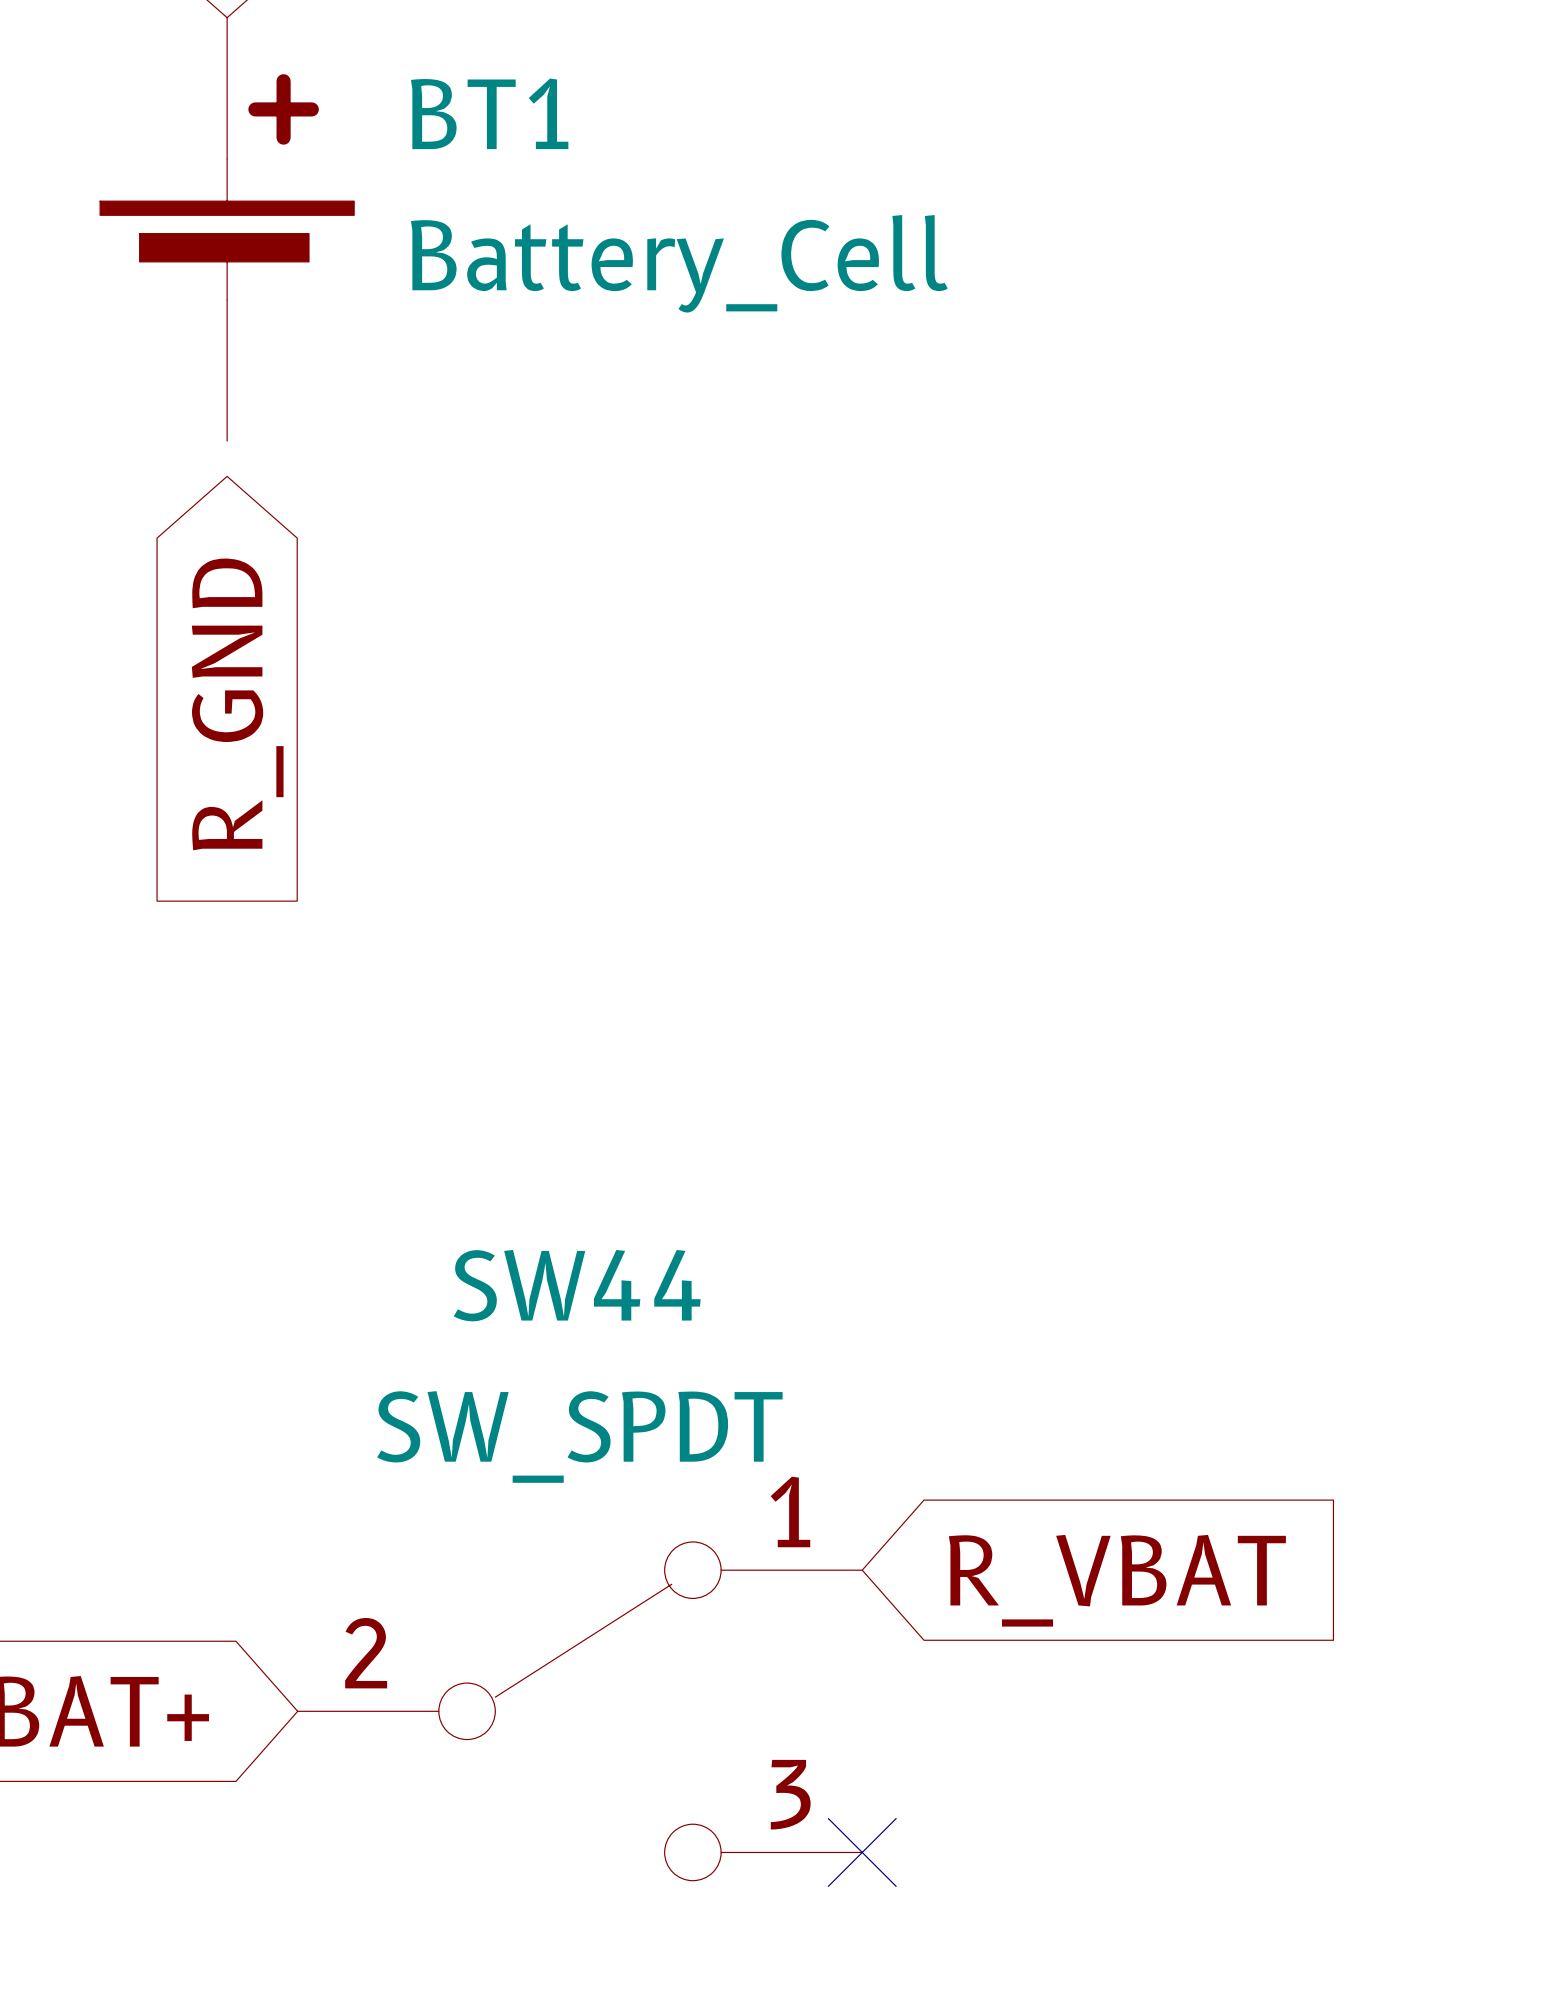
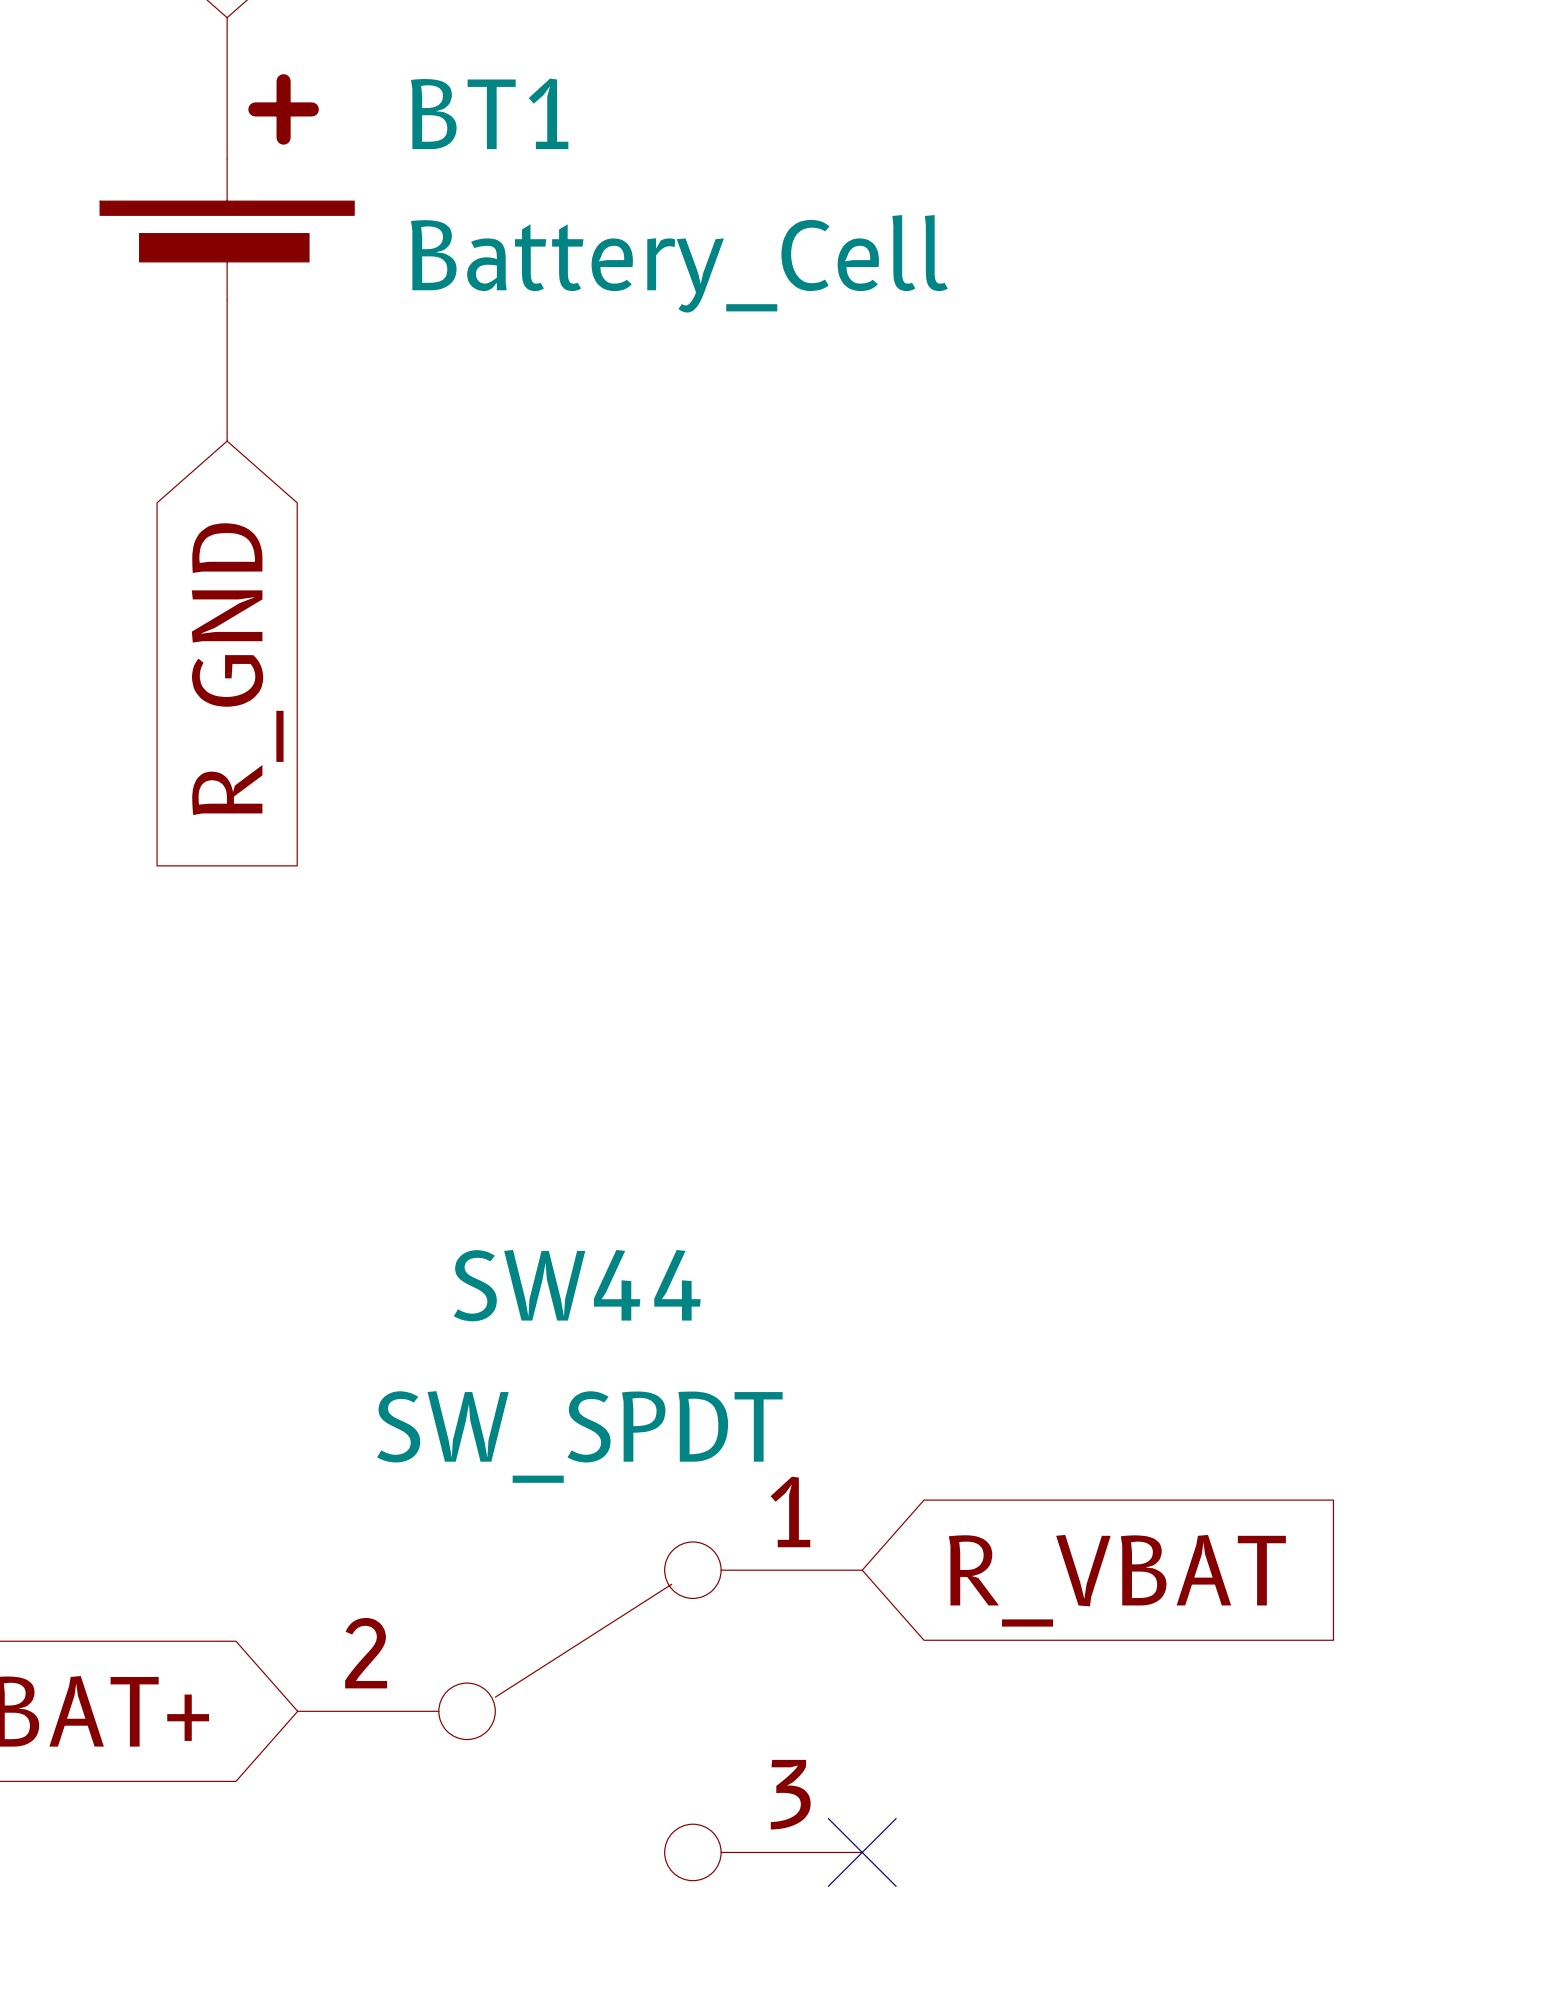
global label position: R_GND (237, 704) -> R_GND (237, 669)

